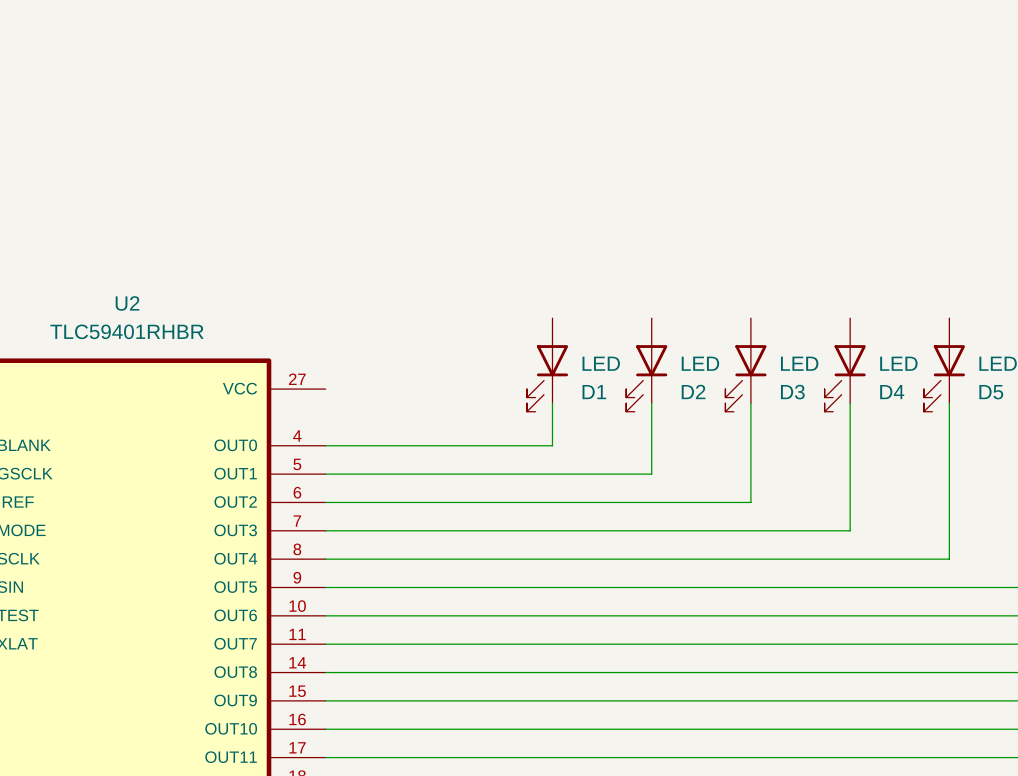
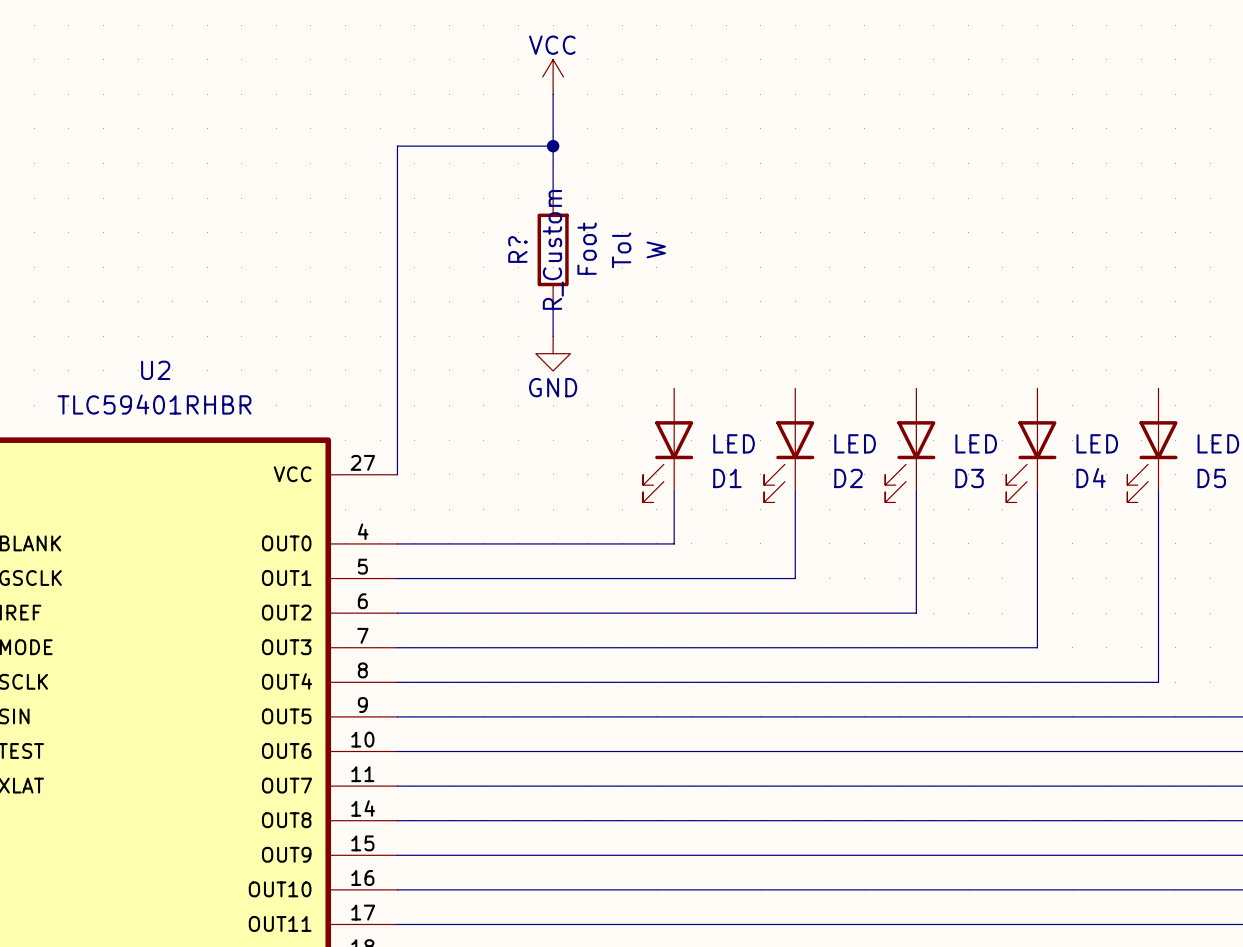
power symbol: none -> VCC (553, 76)
wire: none -> (553, 94) (553, 198)
wire: none -> (553, 146) (397, 146) (397, 474)
junction: none -> (553, 146)
R?: none -> R_Custom (553, 249)
wire: none -> (553, 301) (553, 336)
power symbol: none -> GND (553, 353)

